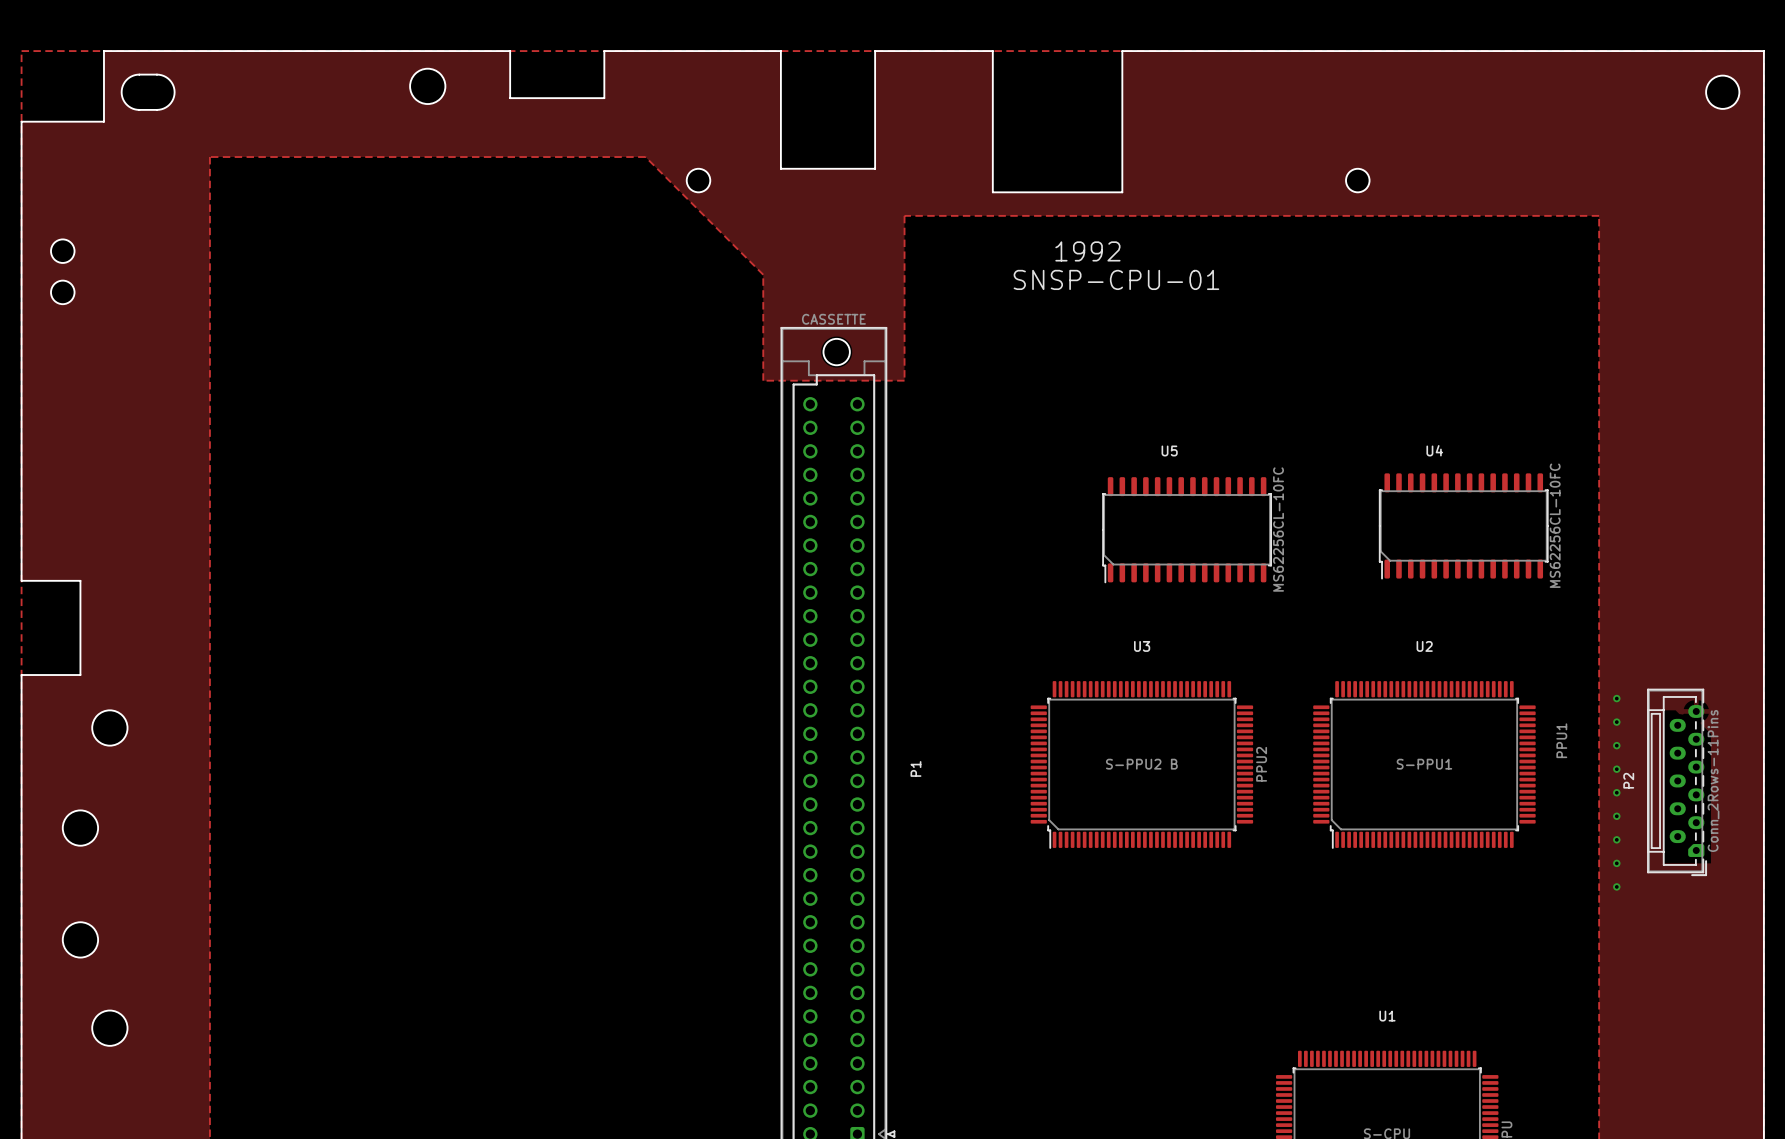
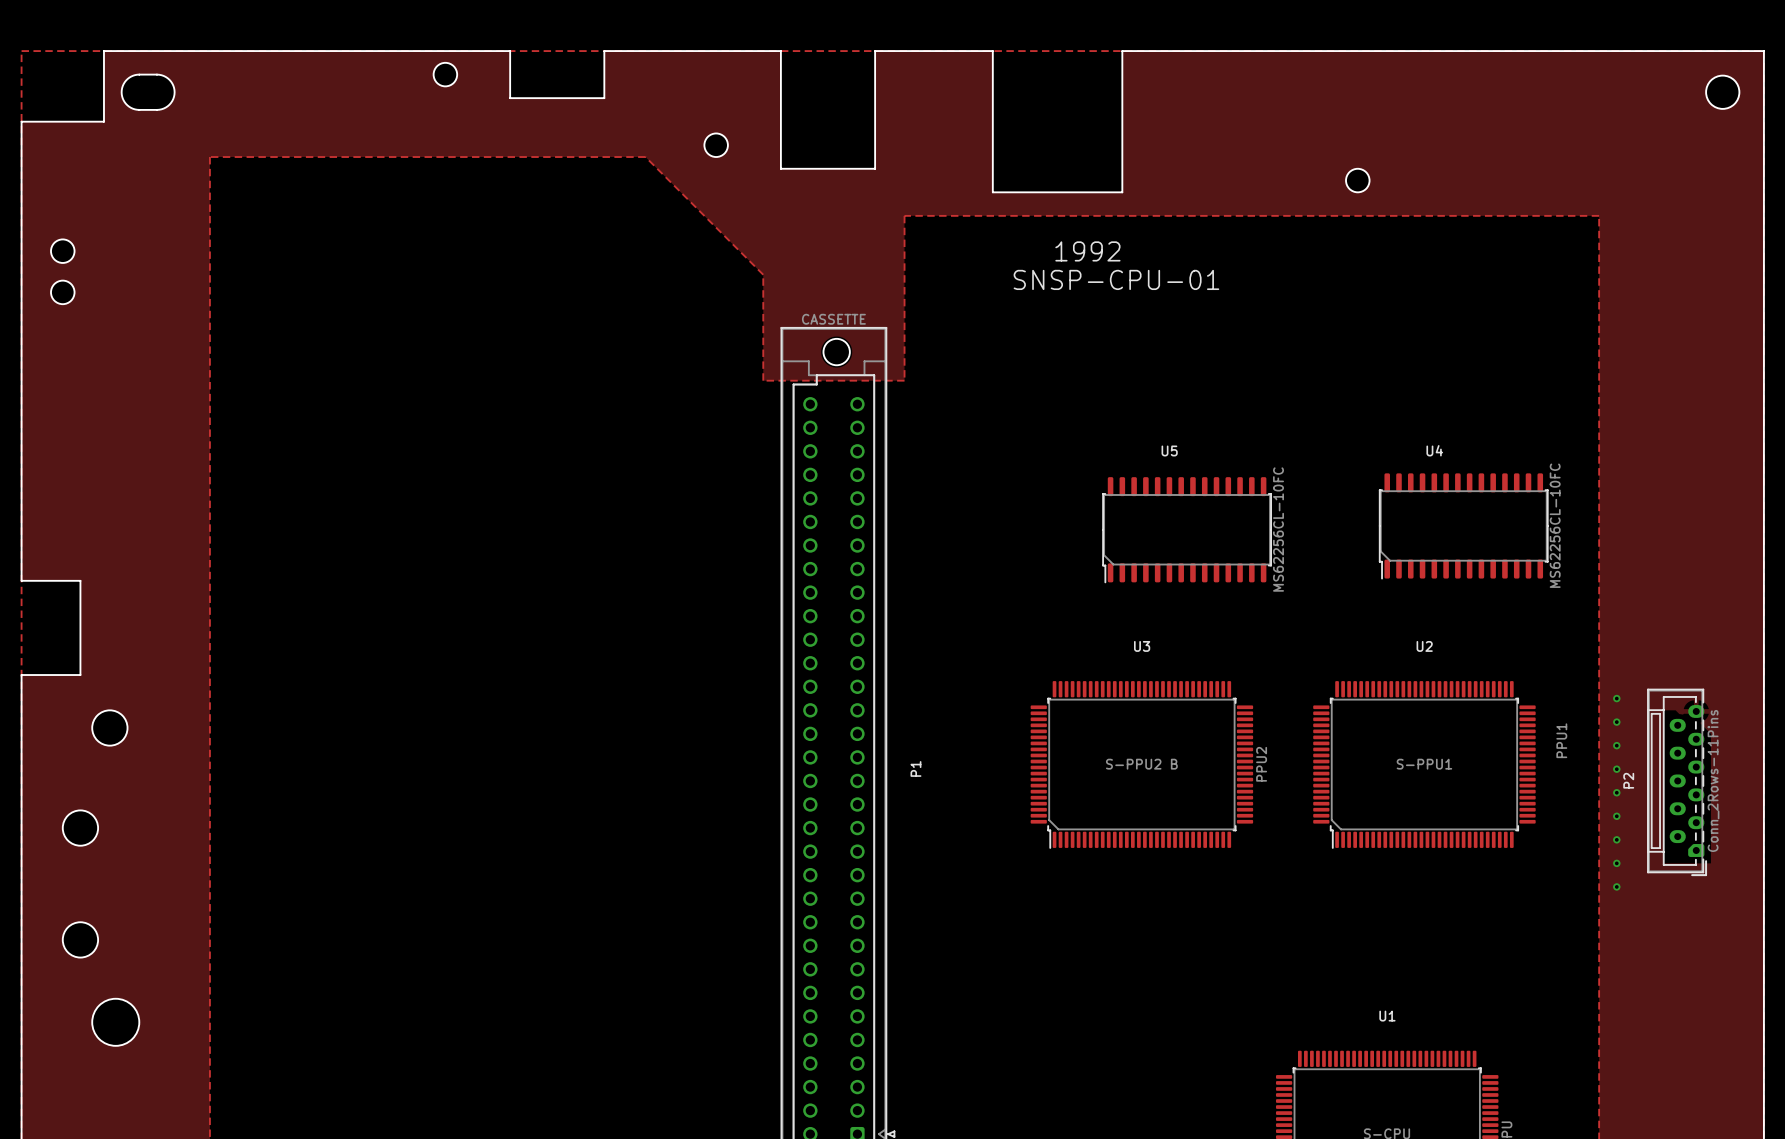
round board edge: none -> [433, 62, 458, 87]
round board edge: [409, 68, 446, 105] -> none
round board edge position: (698, 180) -> (716, 145)
round board edge size: [91, 1010, 128, 1047] -> [91, 998, 140, 1047]

